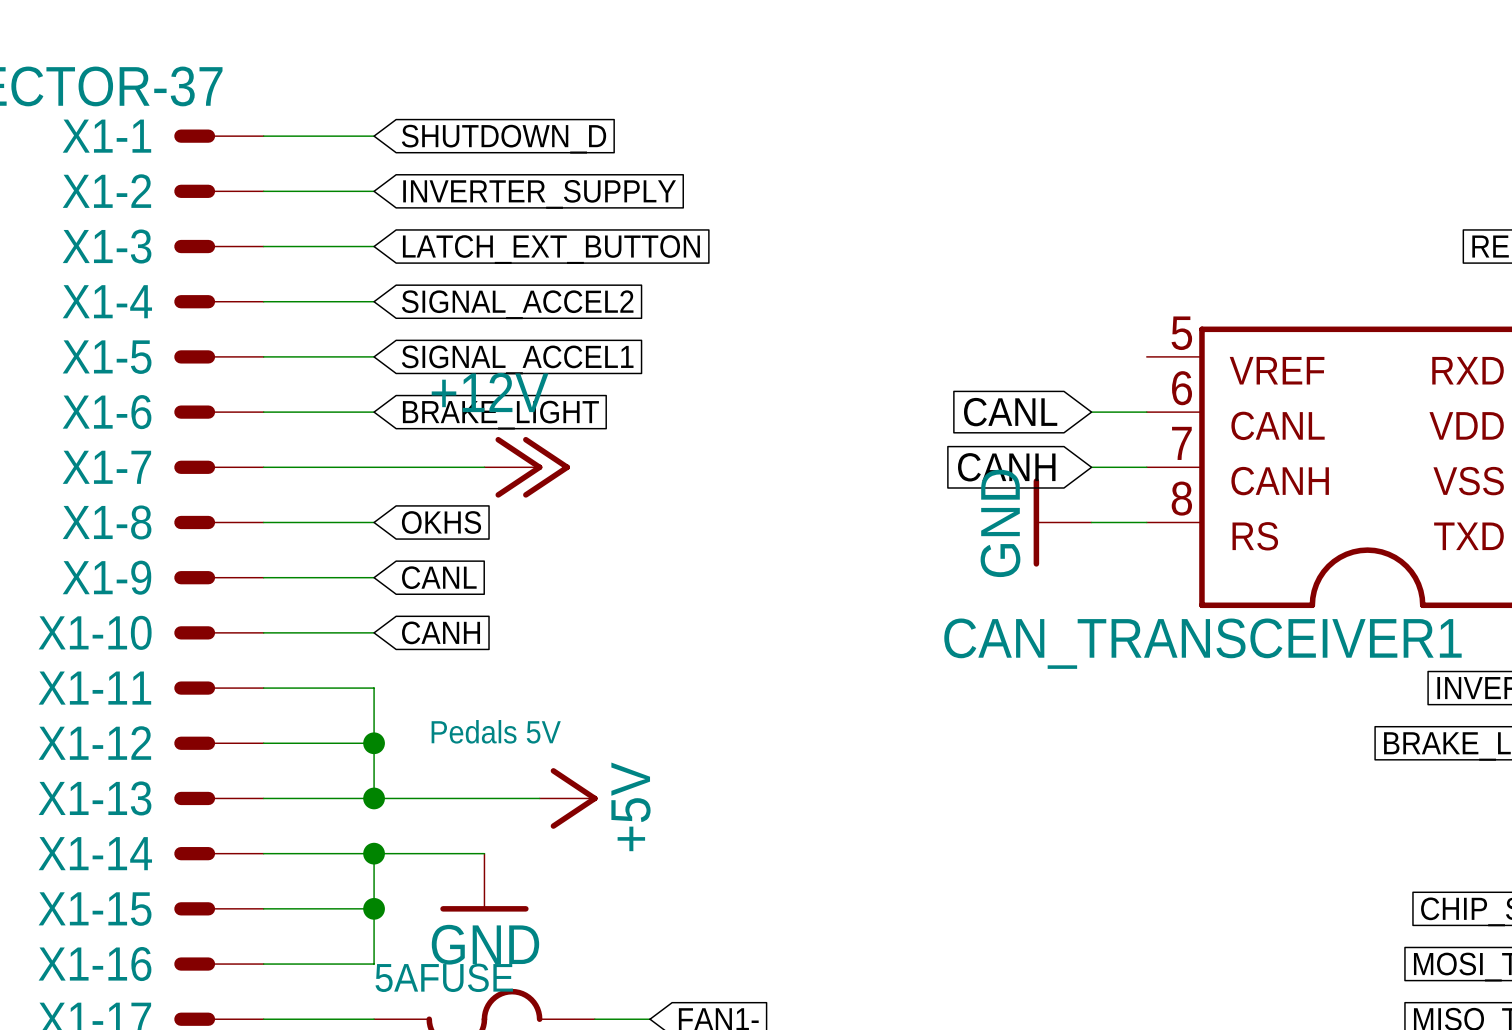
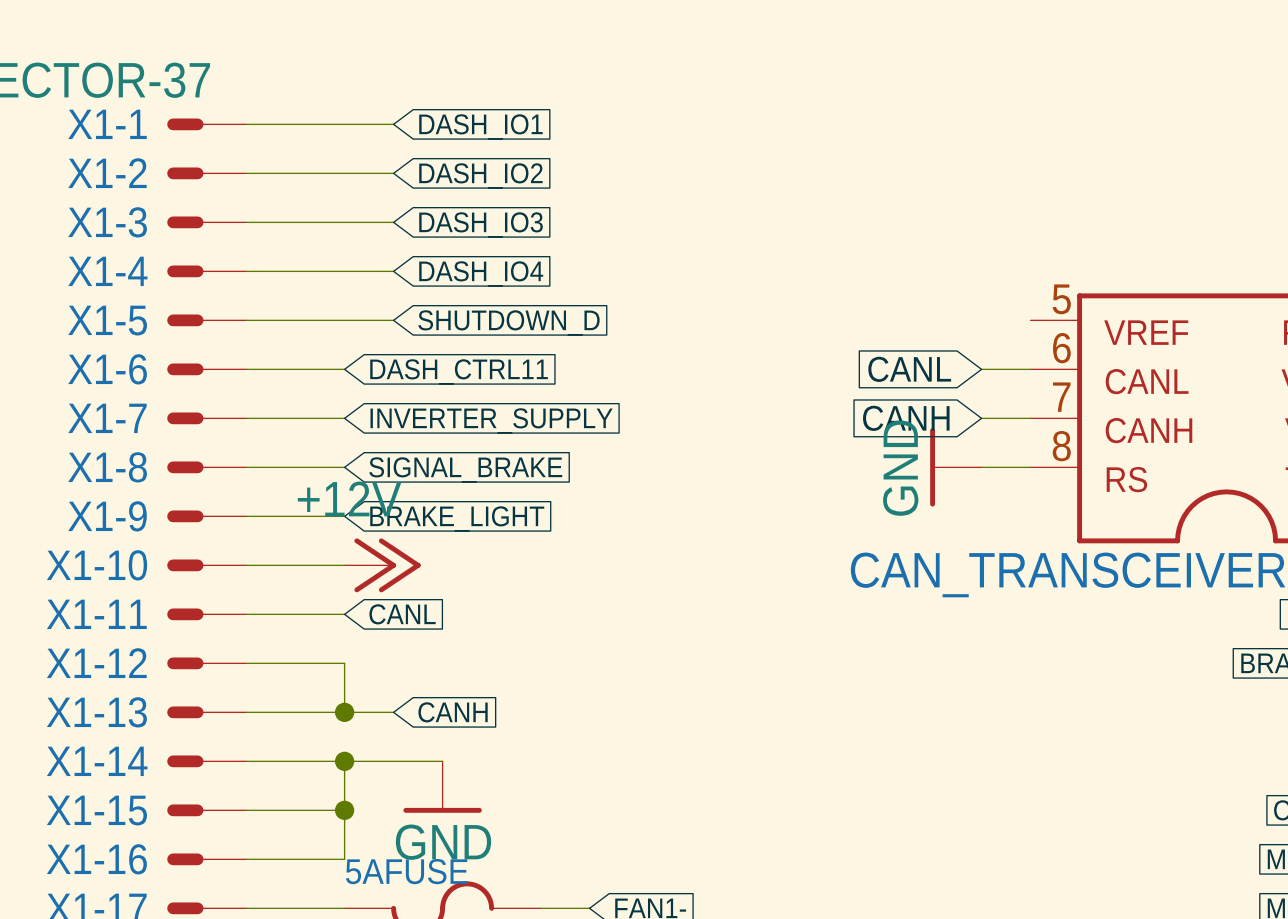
wire: none -> (344, 124) (393, 124)
global label position: SHUTDOWN_D (504, 139) -> SHUTDOWN_D (508, 323)
global label: none -> DASH_IO1 (480, 127)
wire: none -> (344, 173) (393, 173)
global label: none -> DASH_IO2 (480, 176)
global label position: INVERTER_SUPPLY (539, 194) -> INVERTER_SUPPLY (491, 421)
wire: none -> (344, 222) (393, 222)
global label: none -> DASH_IO3 (481, 225)
global label: LATCH_EXT_BUTTON (551, 249) -> none
wire: none -> (344, 271) (393, 271)
global label: SIGNAL_ACCEL2 (517, 304) -> none
global label: none -> DASH_IO4 (481, 274)
wire: none -> (344, 320) (393, 320)
global label: SIGNAL_ACCEL1 (517, 359) -> none
global label: BRAKE_LIGHT (500, 415) -> DASH_CTRL11 (459, 372)
wire: (374, 467) (484, 467) -> none
power symbol position: +12V (527, 467) -> +12V (382, 565)
global label: OKHS (441, 522) -> SIGNAL_BRAKE (465, 470)
global label: CANL (439, 577) -> BRAKE_LIGHT (457, 519)
global label position: CANH (441, 632) -> CANH (453, 712)
wire: (374, 688) (374, 743) -> none
global label: none -> CANL (402, 614)
text: Pedals 5V (496, 731) -> none
junction: (374, 743) -> none
wire: (429, 798) (539, 798) -> none
power symbol: +5V (568, 798) -> none

